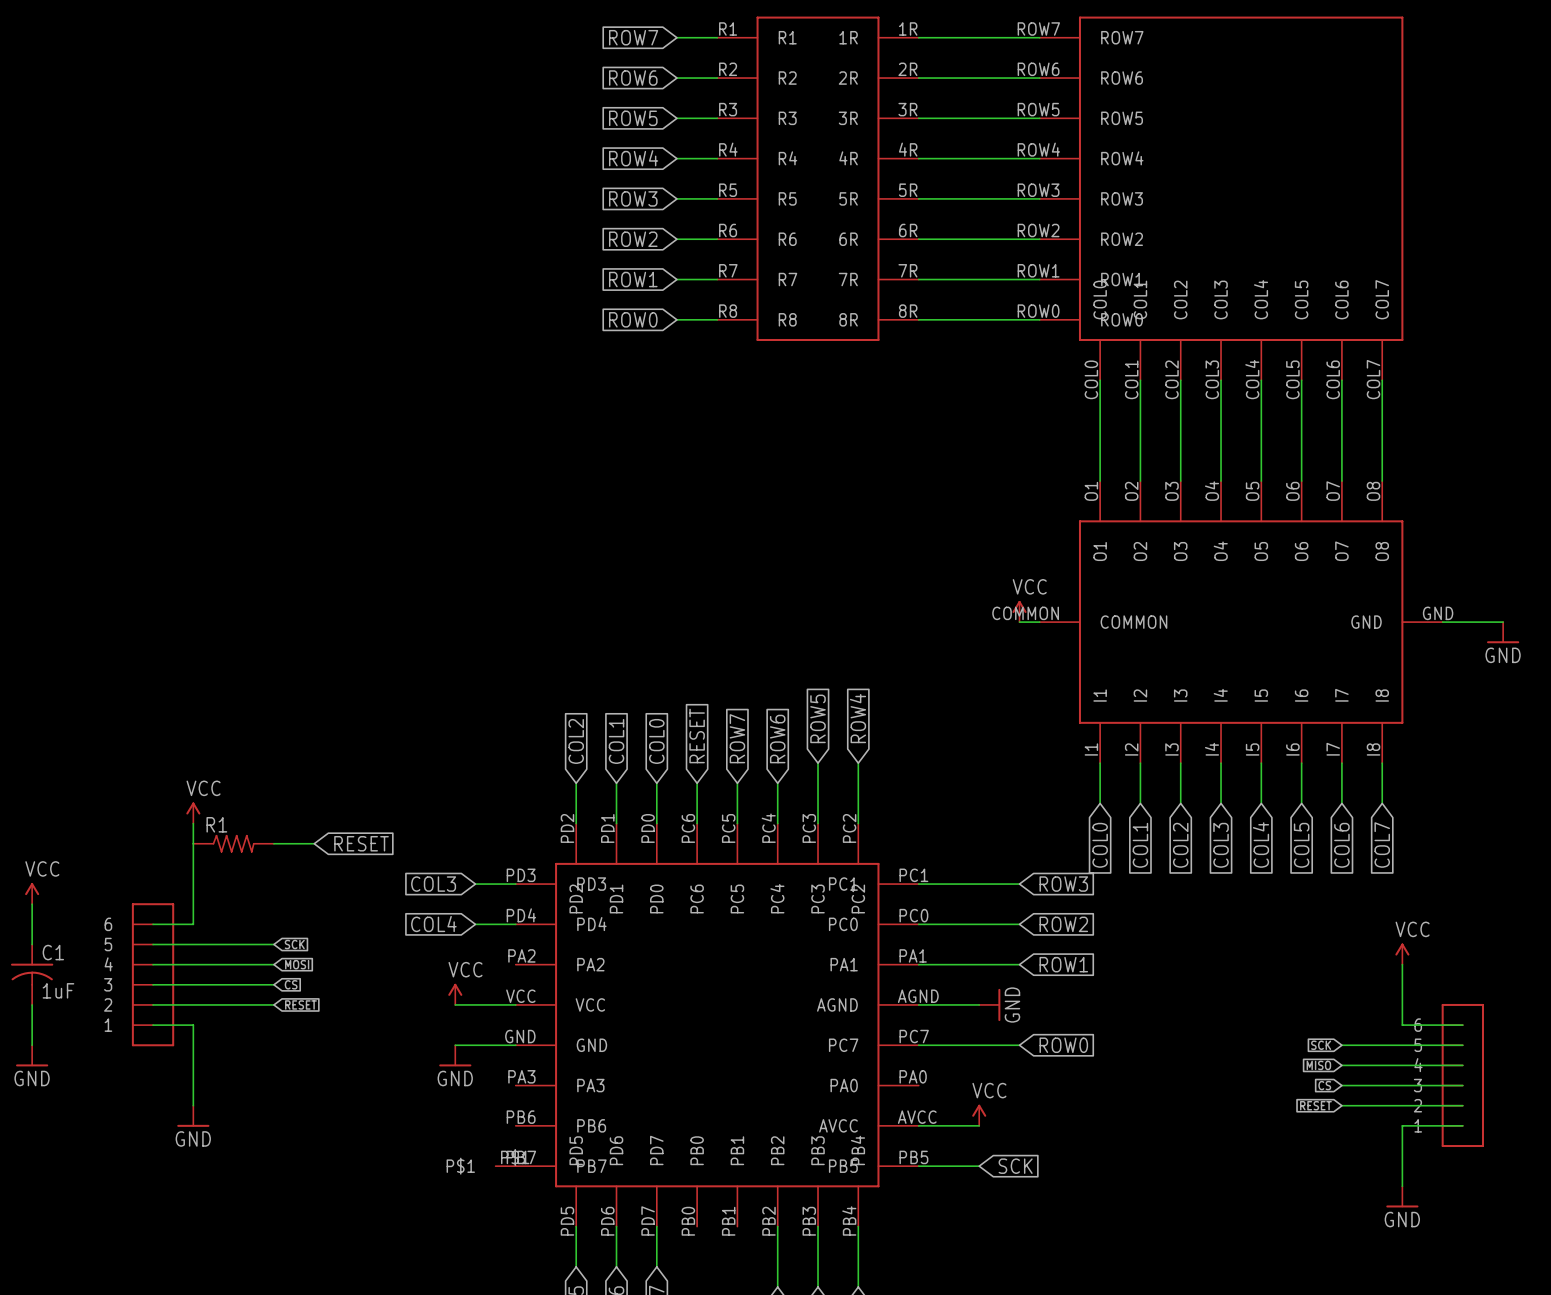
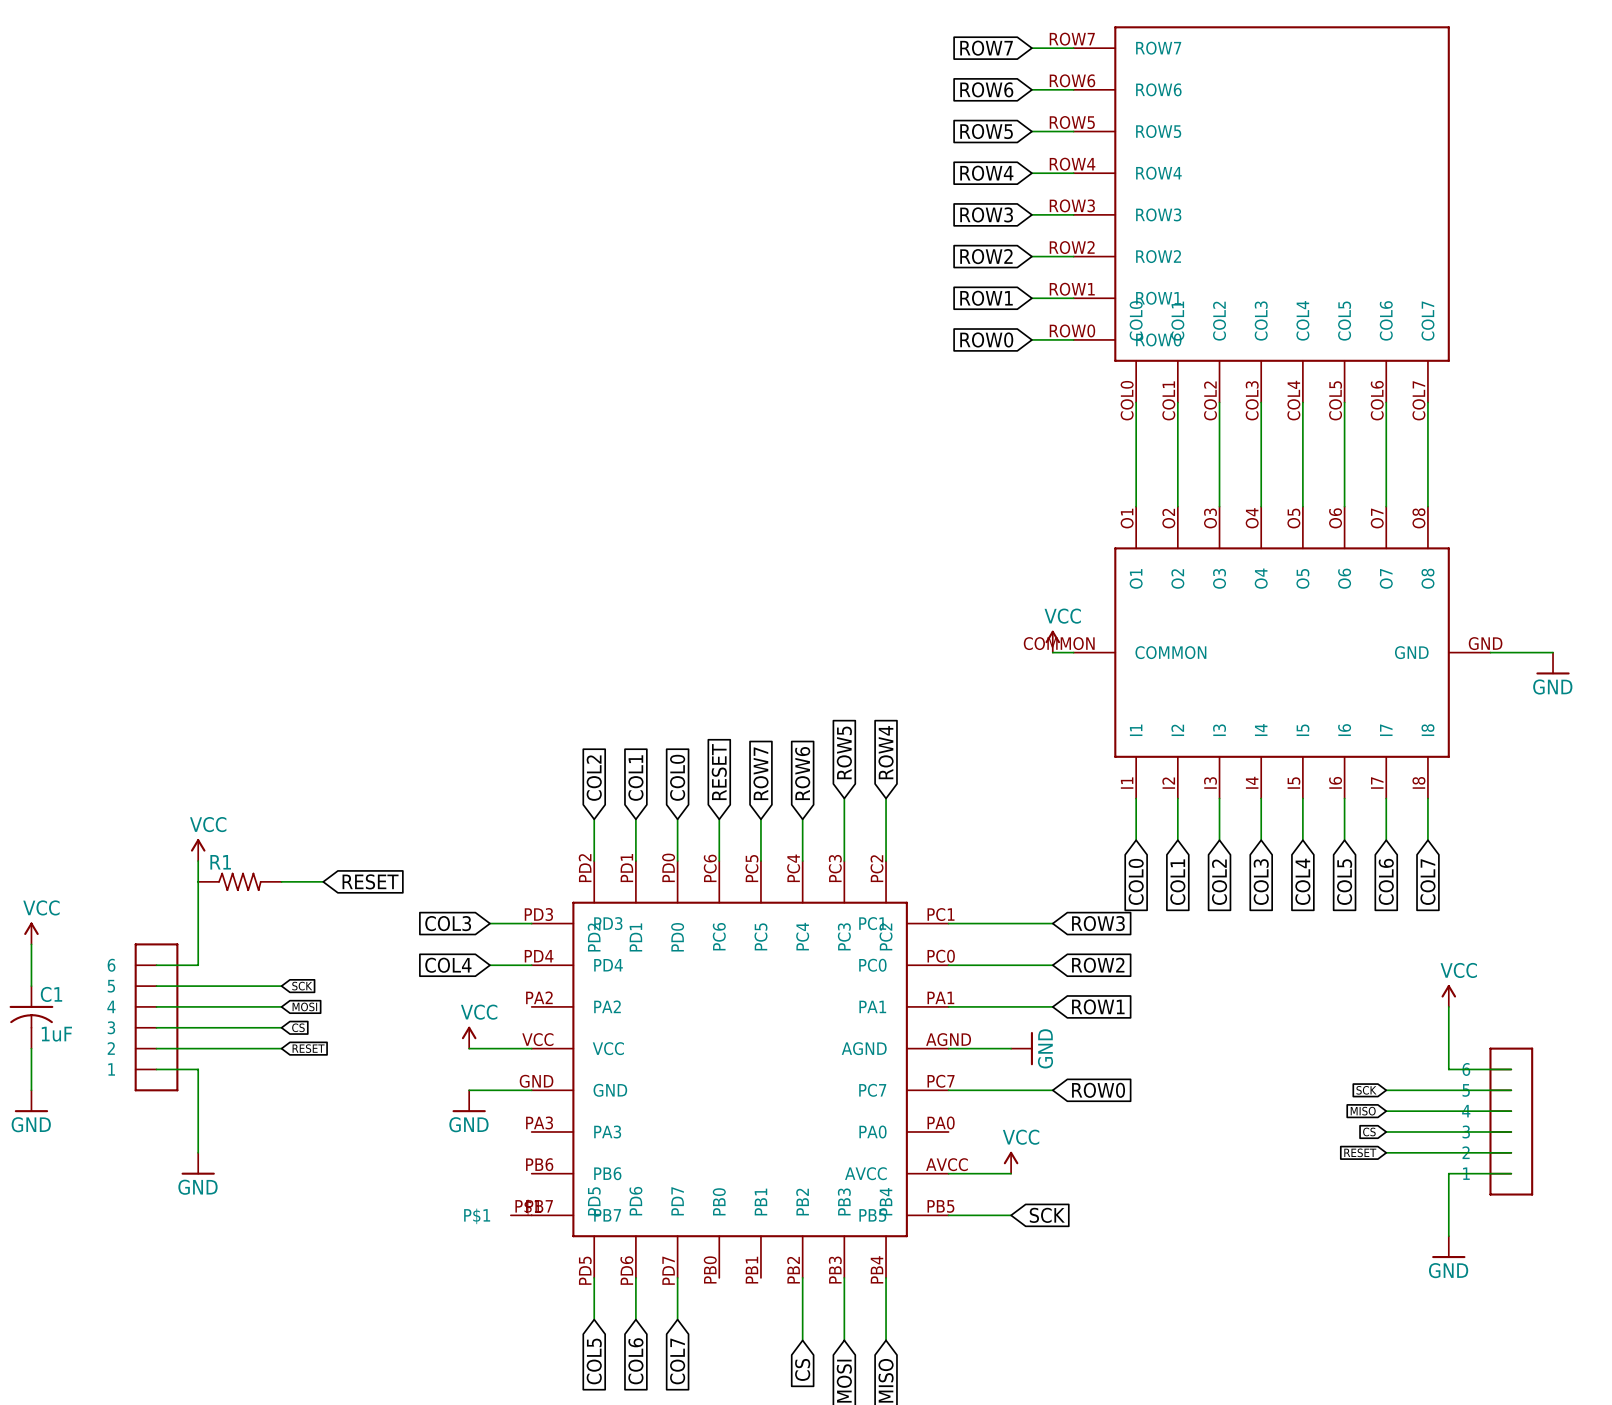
global label: ROW7 (633, 37) -> none
wire: (676, 37) (717, 37) -> none
wire: (918, 37) (999, 37) -> none
global label: none -> ROW7 (986, 48)
global label: ROW6 (633, 78) -> none
wire: (676, 78) (717, 78) -> none
wire: (918, 78) (999, 78) -> none
global label: none -> ROW6 (986, 89)
global label: ROW5 (633, 118) -> none
wire: (676, 118) (717, 118) -> none
wire: (918, 118) (999, 118) -> none
global label: none -> ROW5 (986, 131)
global label: ROW4 (633, 158) -> none
wire: (676, 158) (717, 158) -> none
wire: (918, 158) (999, 158) -> none
global label: none -> ROW4 (986, 173)
part: (818, 178) -> none
global label: ROW3 (633, 198) -> none
wire: (676, 198) (717, 198) -> none
wire: (918, 198) (999, 198) -> none
global label: none -> ROW3 (986, 214)
global label: ROW2 (633, 239) -> none
wire: (676, 239) (717, 239) -> none
wire: (918, 239) (999, 239) -> none
global label: none -> ROW2 (986, 256)
global label: ROW1 (633, 279) -> none
wire: (676, 279) (717, 279) -> none
wire: (918, 279) (999, 279) -> none
global label: none -> ROW1 (986, 298)
global label: ROW0 (633, 319) -> none
wire: (676, 319) (717, 319) -> none
wire: (918, 319) (999, 319) -> none
global label: none -> ROW0 (986, 339)

